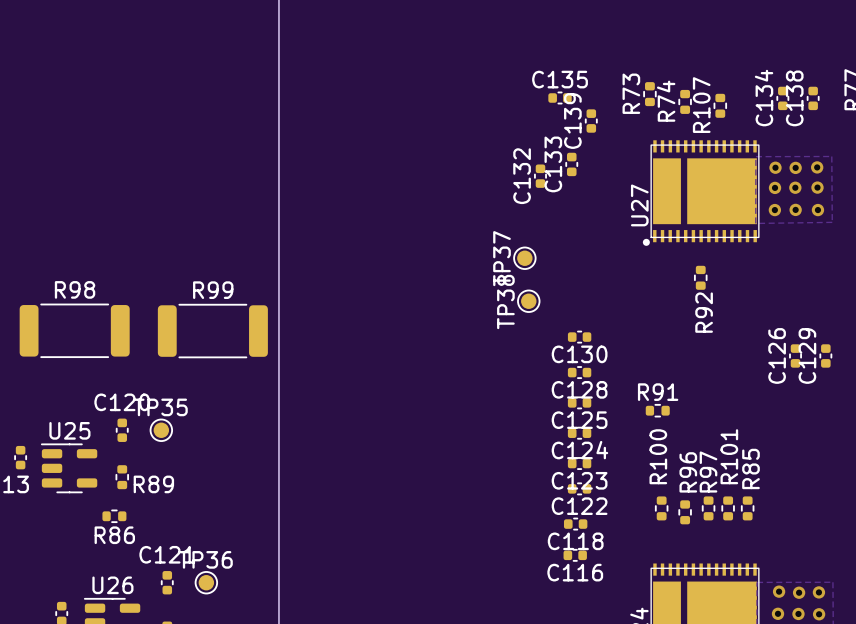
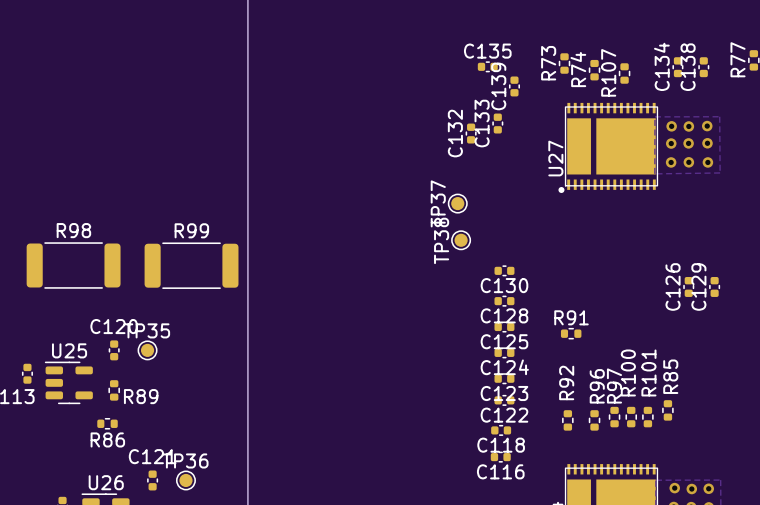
R92 position: (700, 277) -> (567, 420)
R92 name position: R92 (704, 312) -> R92 (566, 382)
R101 name: R101 (729, 456) -> R100 (628, 372)
R85 name: R85 (750, 468) -> R101 (648, 372)
R85: none -> (667, 410)
R100: (661, 508) -> none

